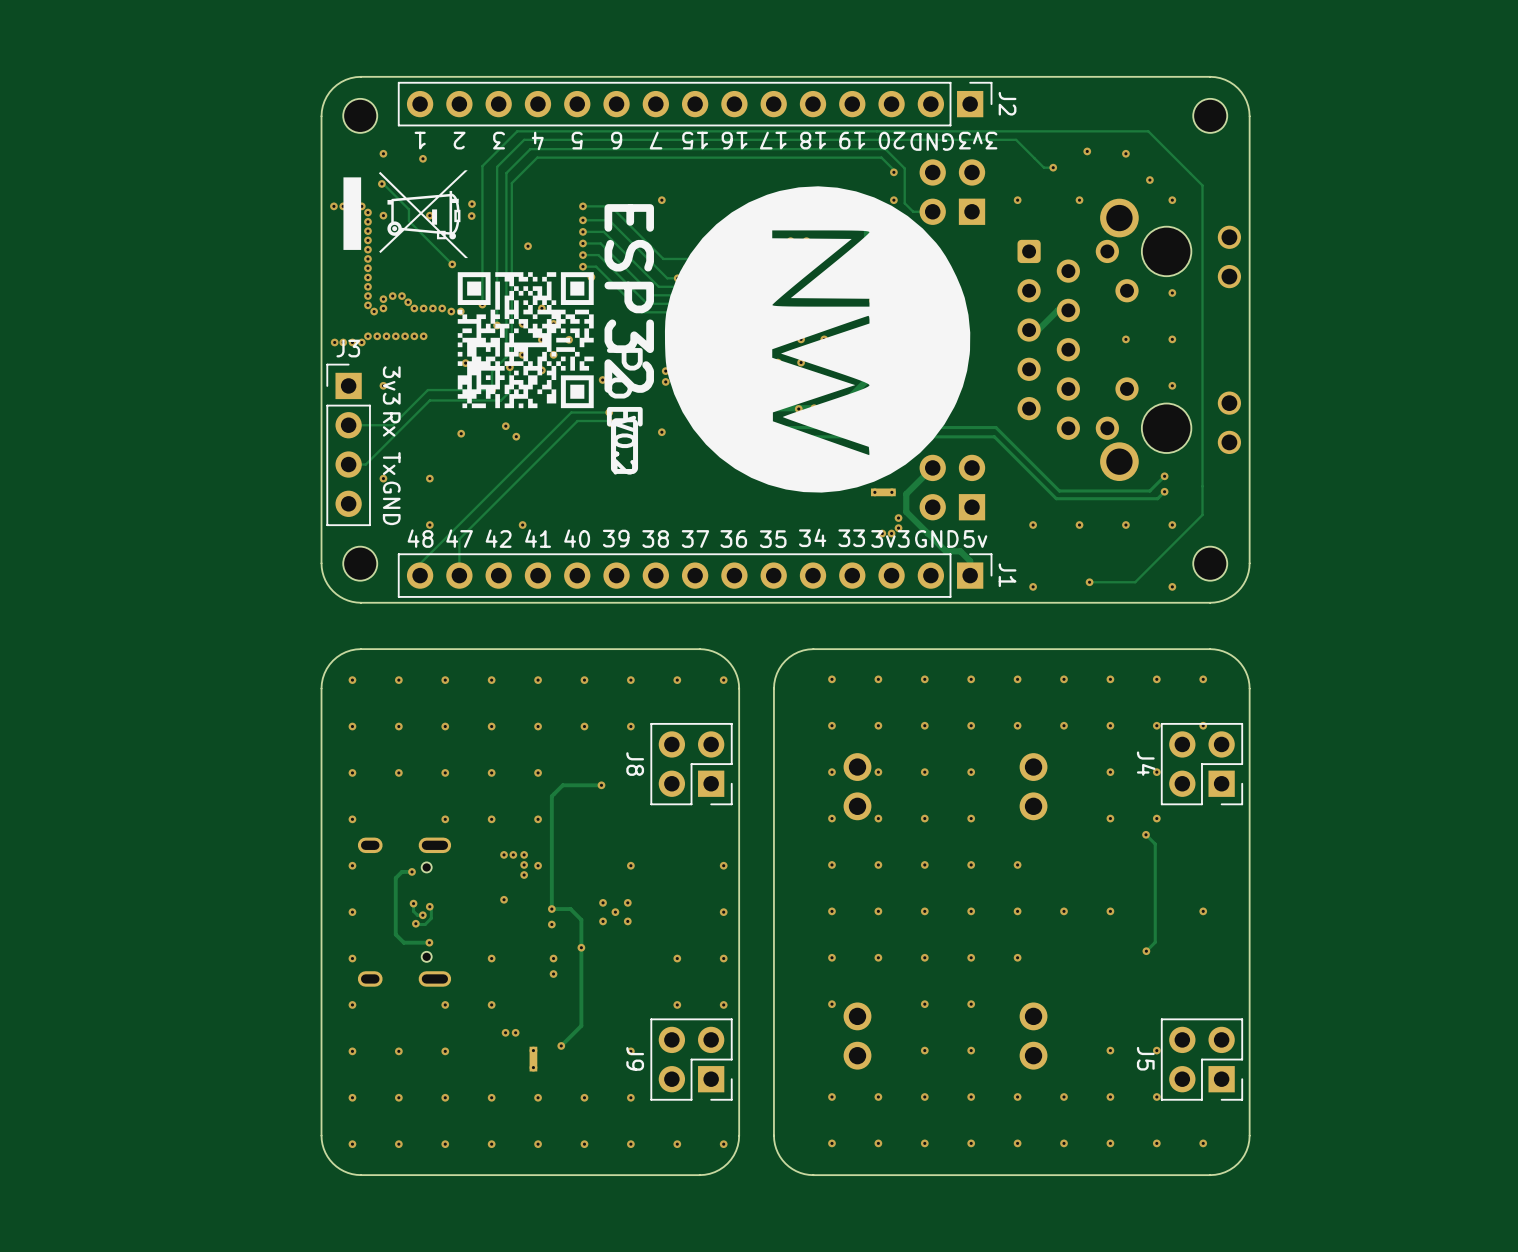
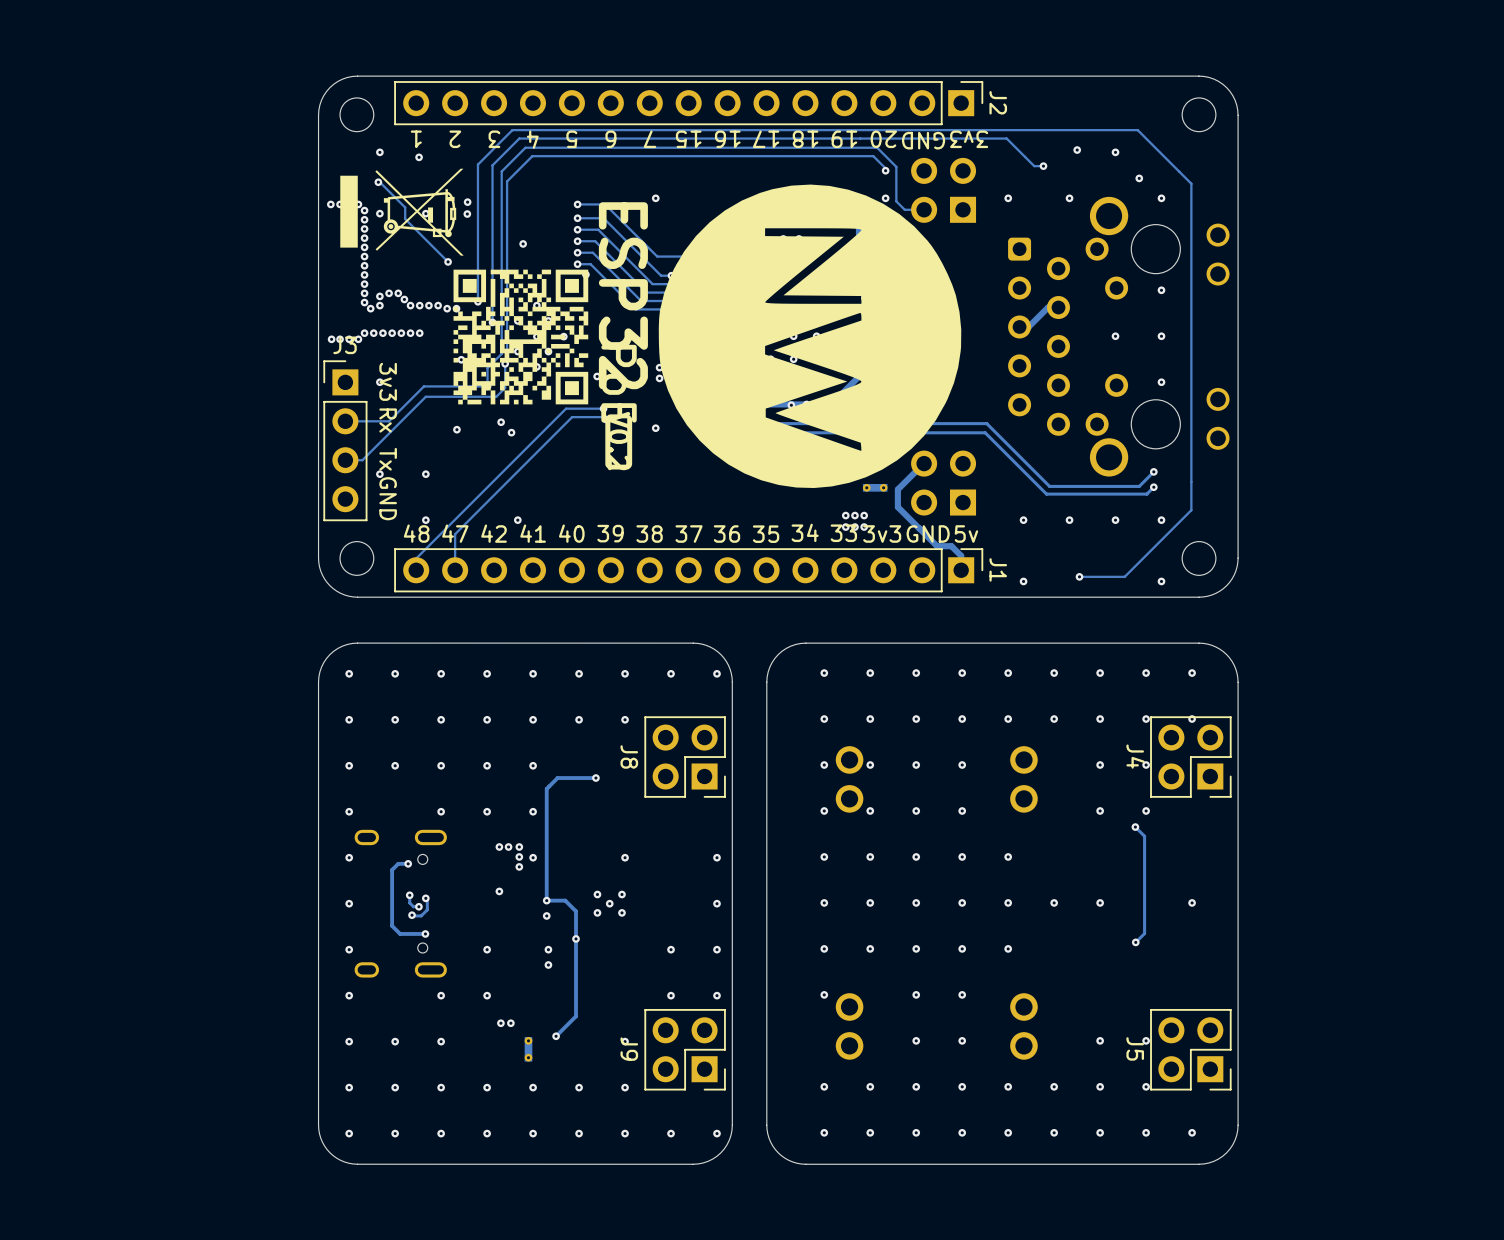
via: (898, 518) -> none
via: none -> (845, 515)
via: none -> (854, 515)
via: none -> (864, 515)
via: (898, 528) -> none
via: none -> (845, 527)
via: none -> (854, 527)
via: none -> (864, 527)
via: (882, 533) -> none
via: (891, 533) -> none

